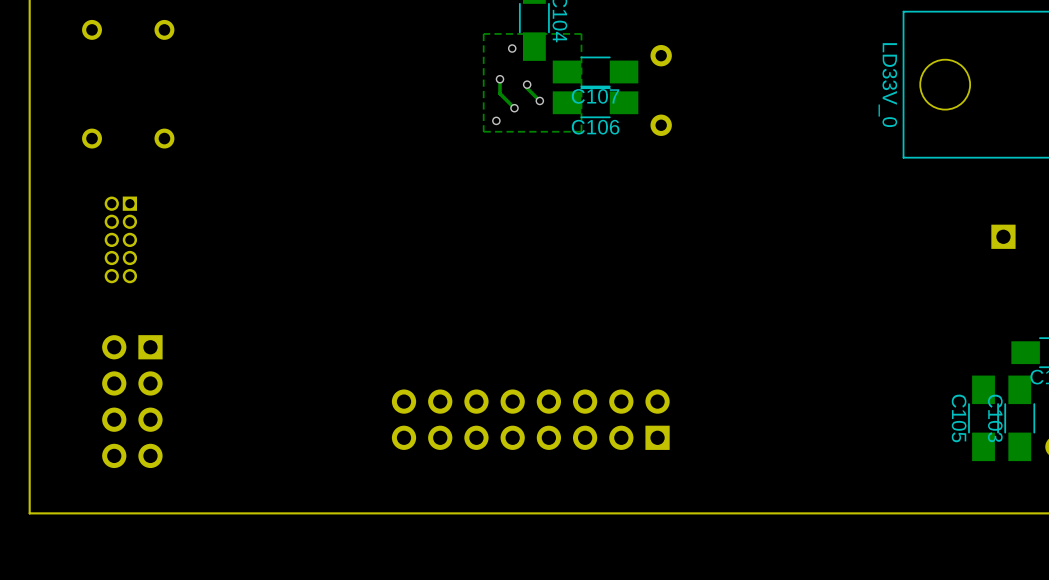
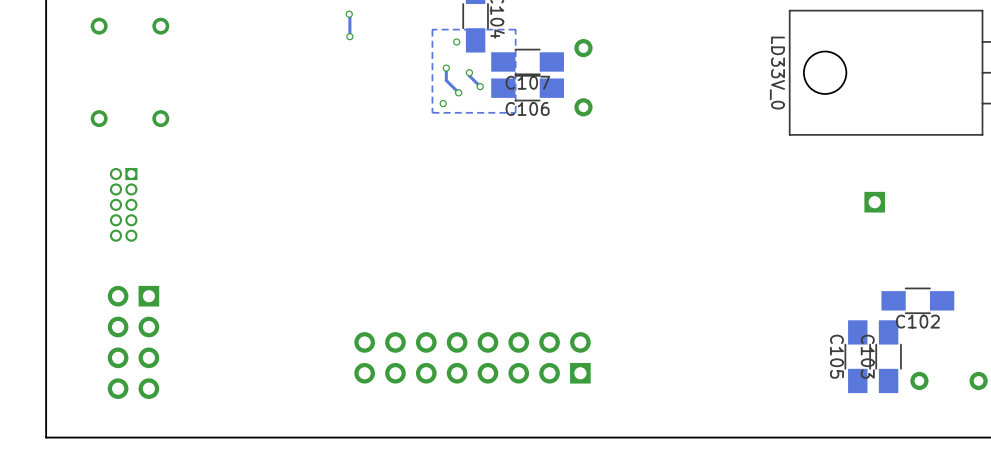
track: none -> (349, 14) (349, 36)
via: none -> (349, 14)
via: none -> (349, 36)

